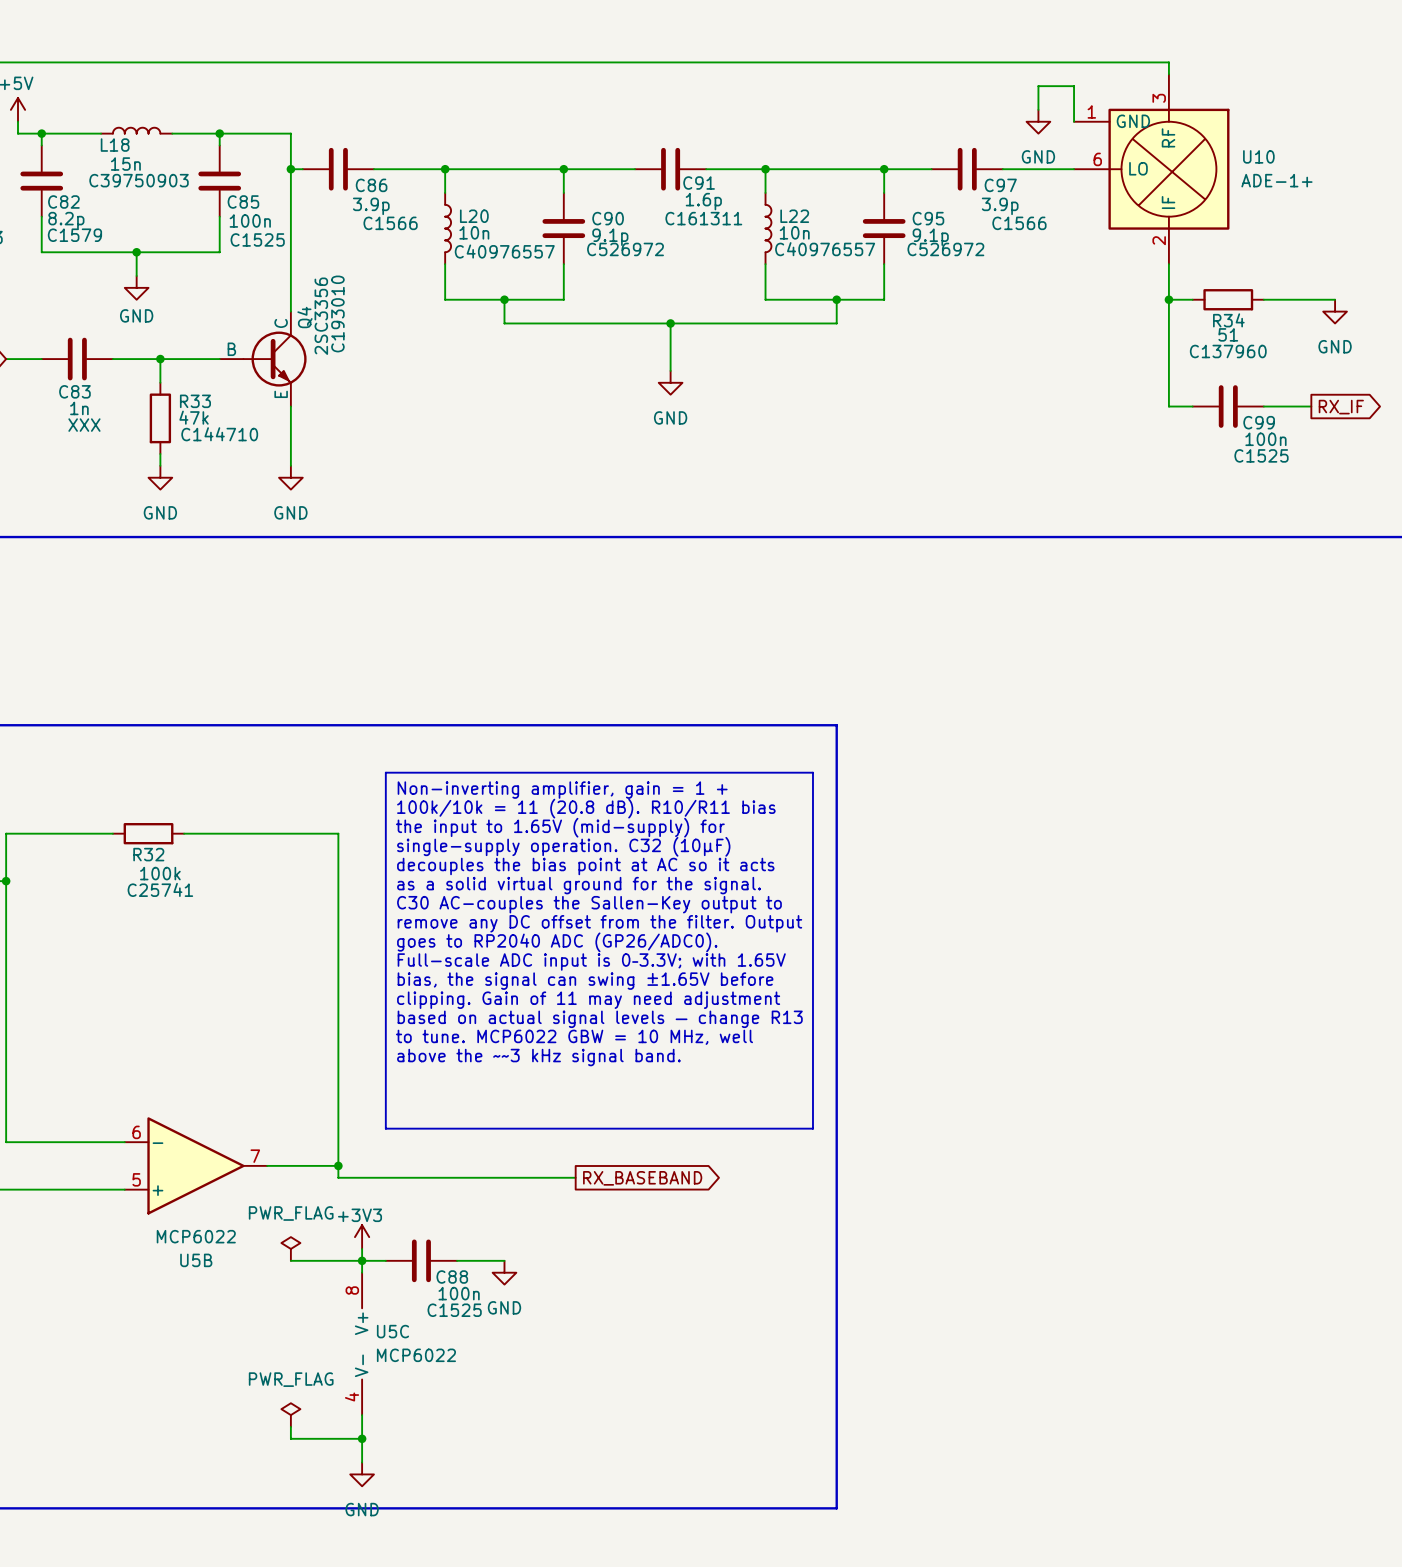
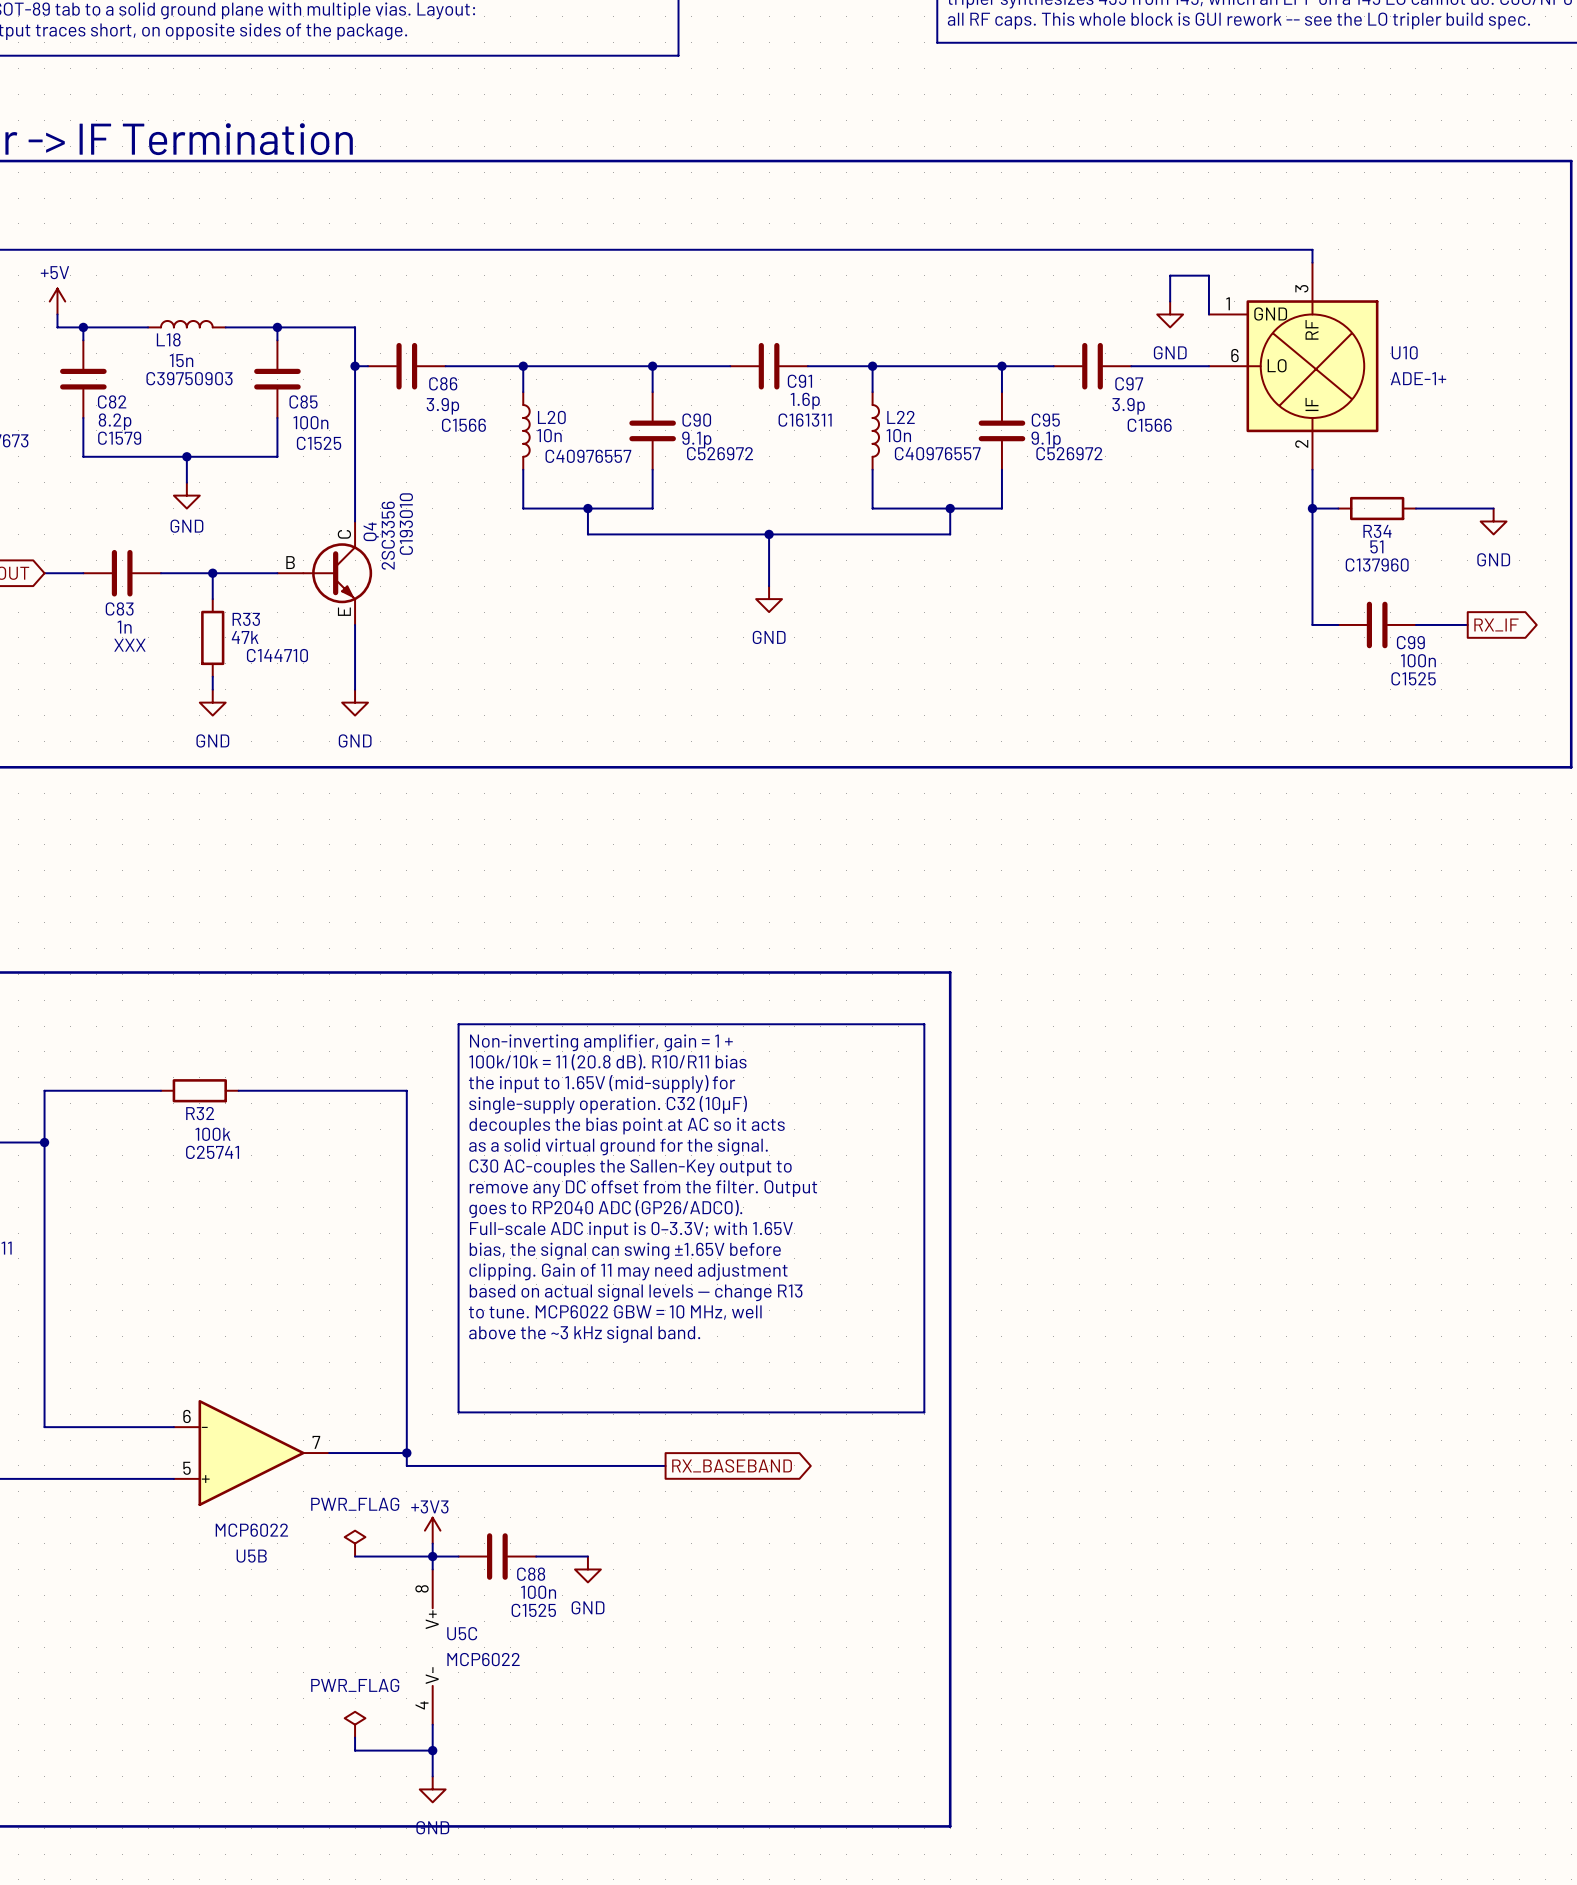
text: above the ~~3 kHz signal band. (538, 1057) -> above the ~3 kHz signal band. (584, 1334)

